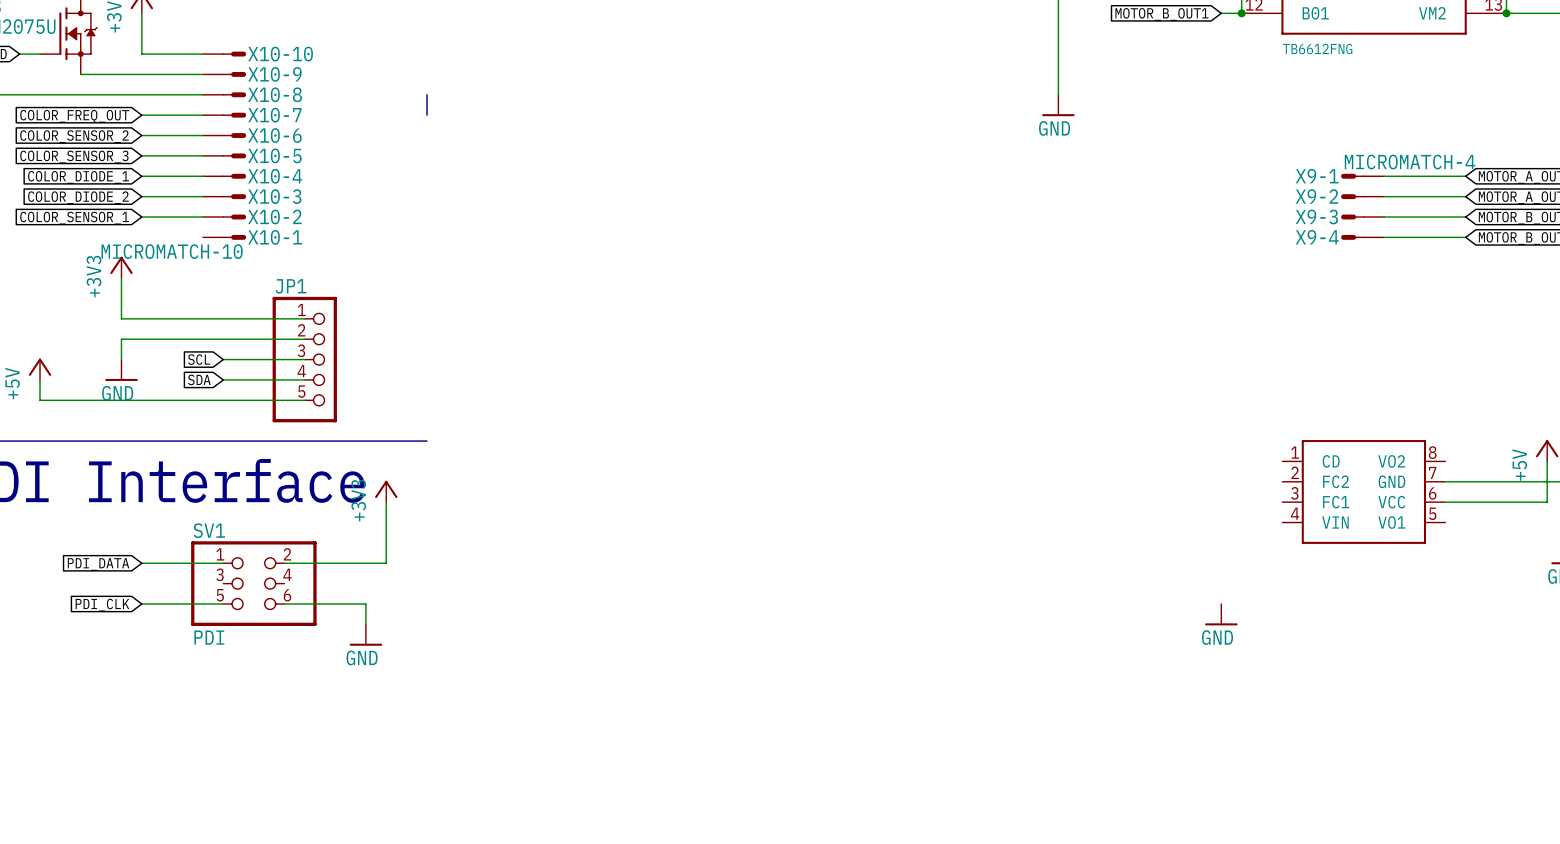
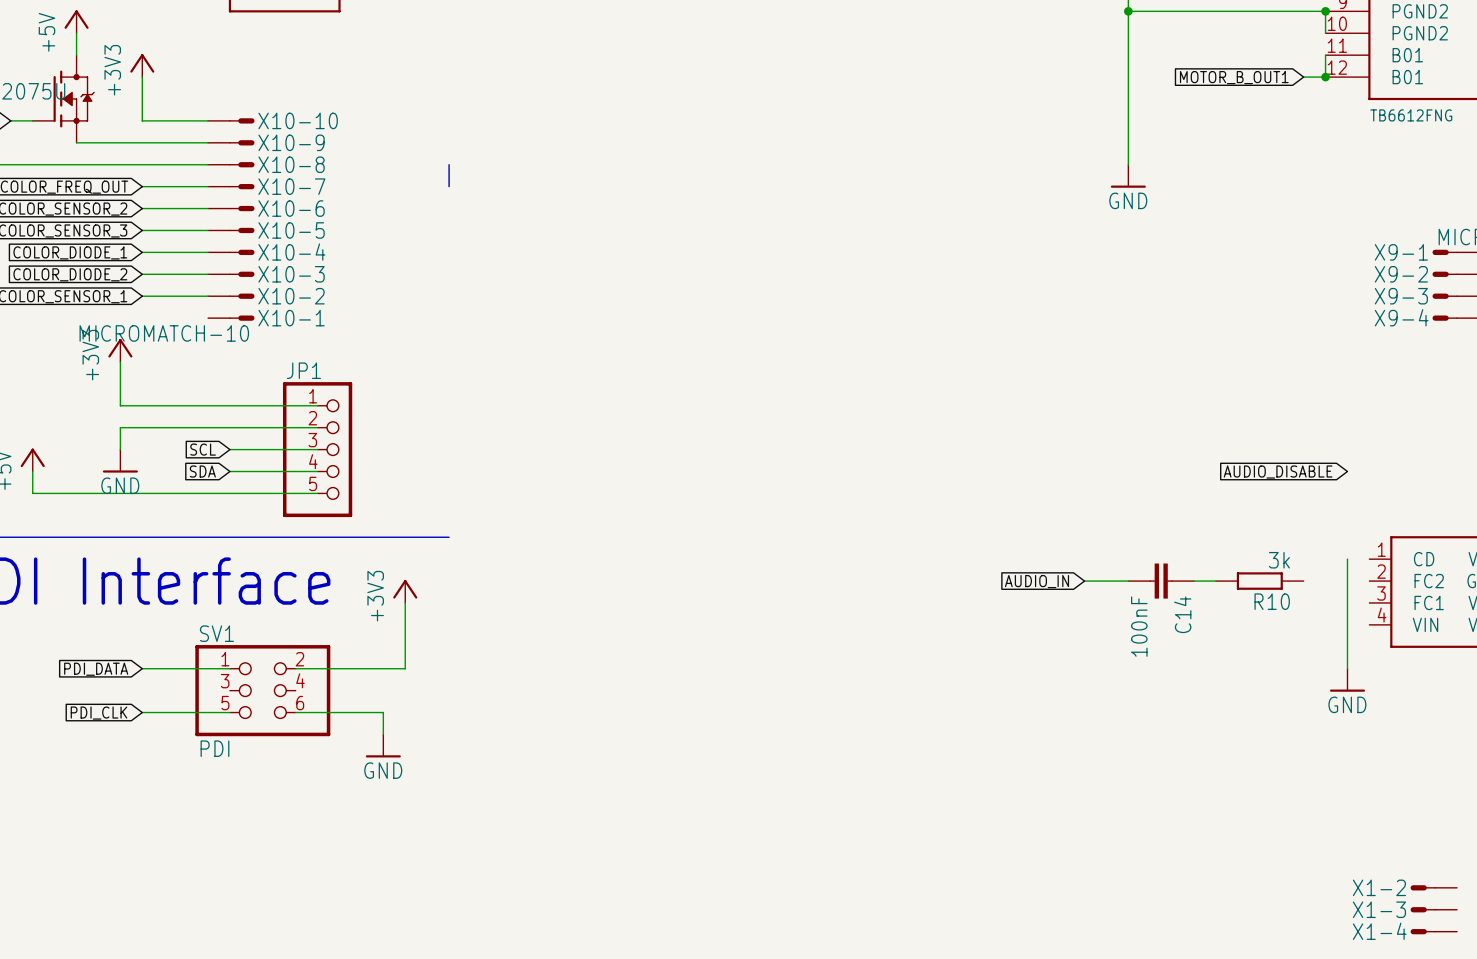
global label: none -> AUDIO_DISABLE (1278, 472)
wire: none -> (1347, 559) (1347, 668)
wire: none -> (1084, 581) (1128, 581)
C14: none -> 100nF (1161, 581)
wire: none -> (1194, 581) (1216, 581)
R10: none -> 3k (1259, 581)
global label: none -> AUDIO_IN (1037, 581)
power symbol position: GND (1221, 614) -> GND (1347, 680)
X1-2: none -> (1433, 887)
X1-3: none -> (1433, 909)
X1-4: none -> (1433, 931)

